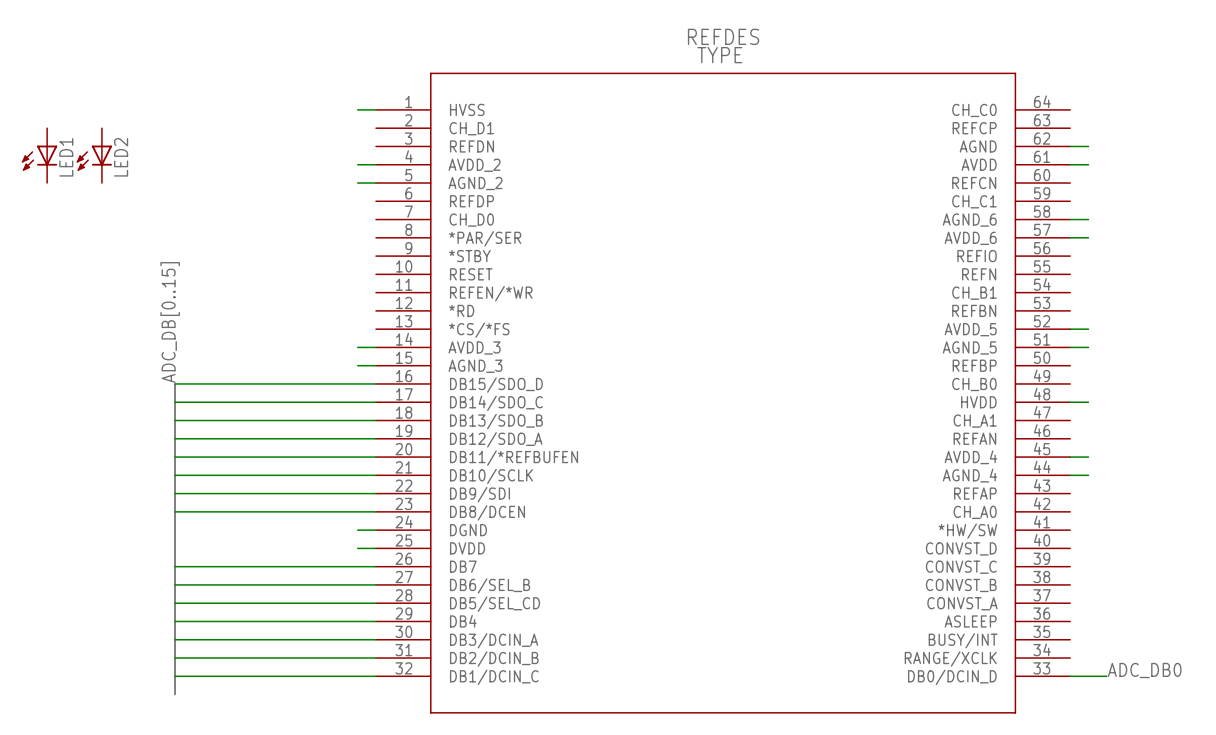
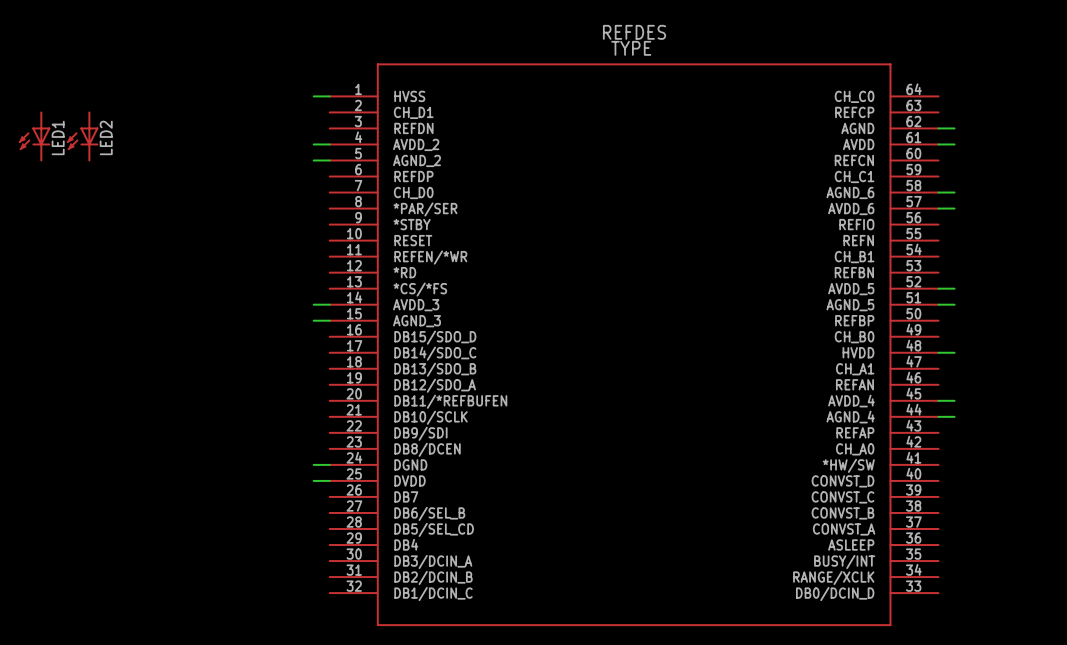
label: ADC_DB[0..15] (170, 322) -> none
bus: (175, 383) (175, 694) -> none
wire: (175, 383) (375, 383) -> none
wire: (175, 402) (375, 402) -> none
wire: (175, 420) (375, 420) -> none
wire: (175, 438) (375, 438) -> none
wire: (175, 457) (375, 457) -> none
wire: (175, 475) (375, 475) -> none
wire: (175, 493) (375, 493) -> none
wire: (175, 511) (375, 511) -> none
wire: (175, 566) (375, 566) -> none
wire: (175, 584) (375, 584) -> none
wire: (175, 603) (375, 603) -> none
wire: (175, 621) (375, 621) -> none
wire: (175, 639) (375, 639) -> none
wire: (175, 658) (375, 658) -> none
label: ADC_DB0 (1144, 670) -> none
wire: (175, 676) (375, 676) -> none
wire: (1070, 676) (1106, 676) -> none

